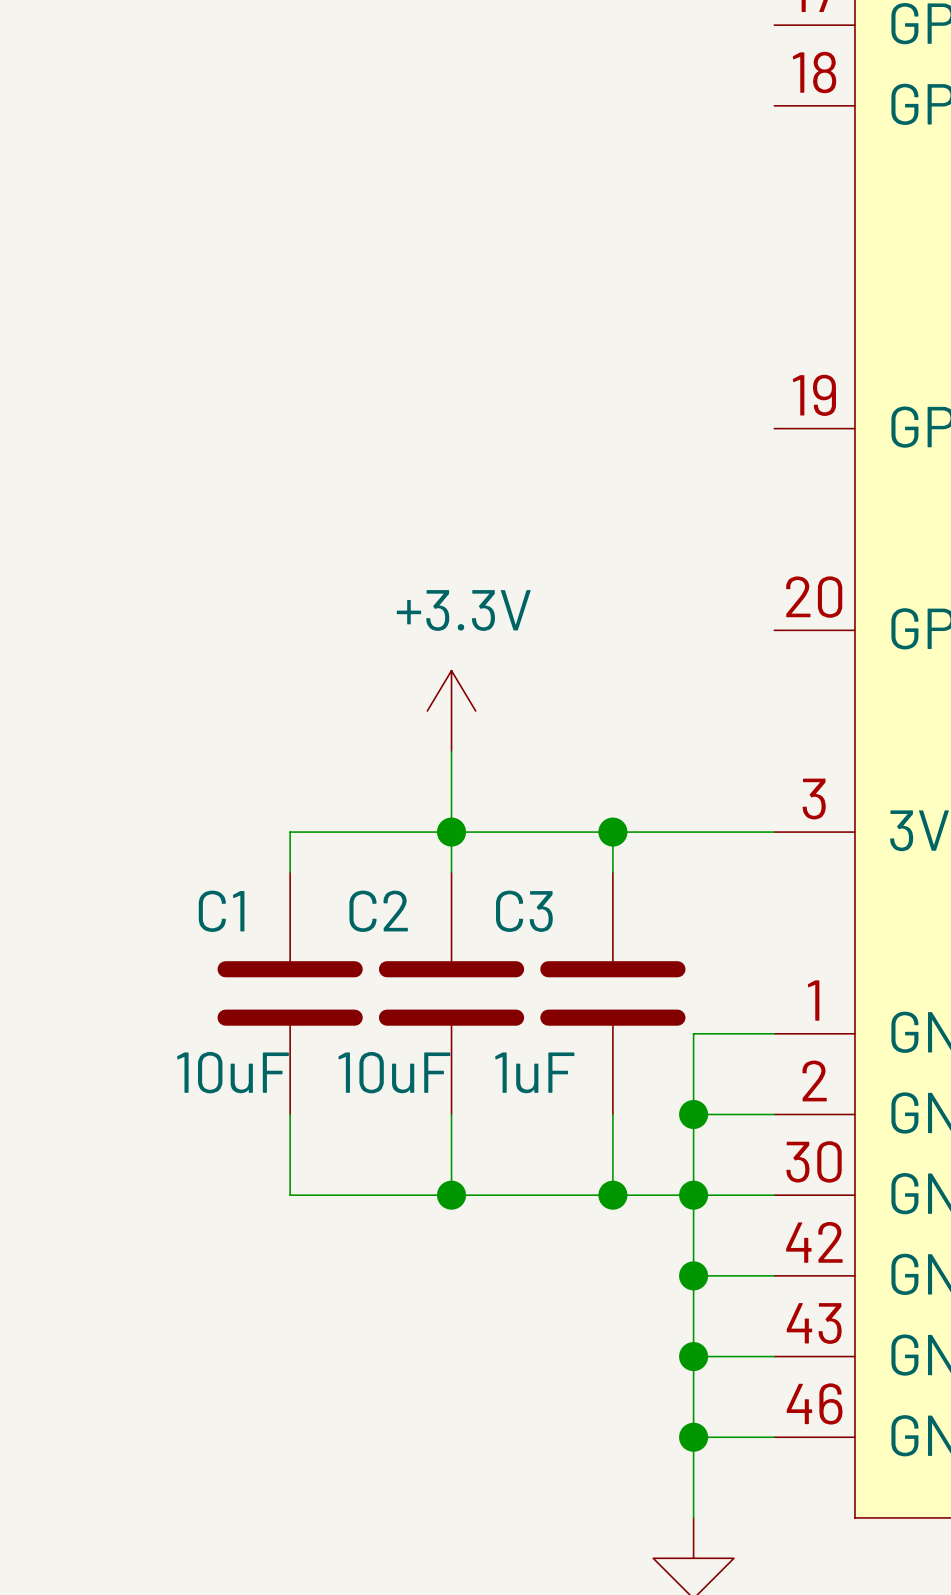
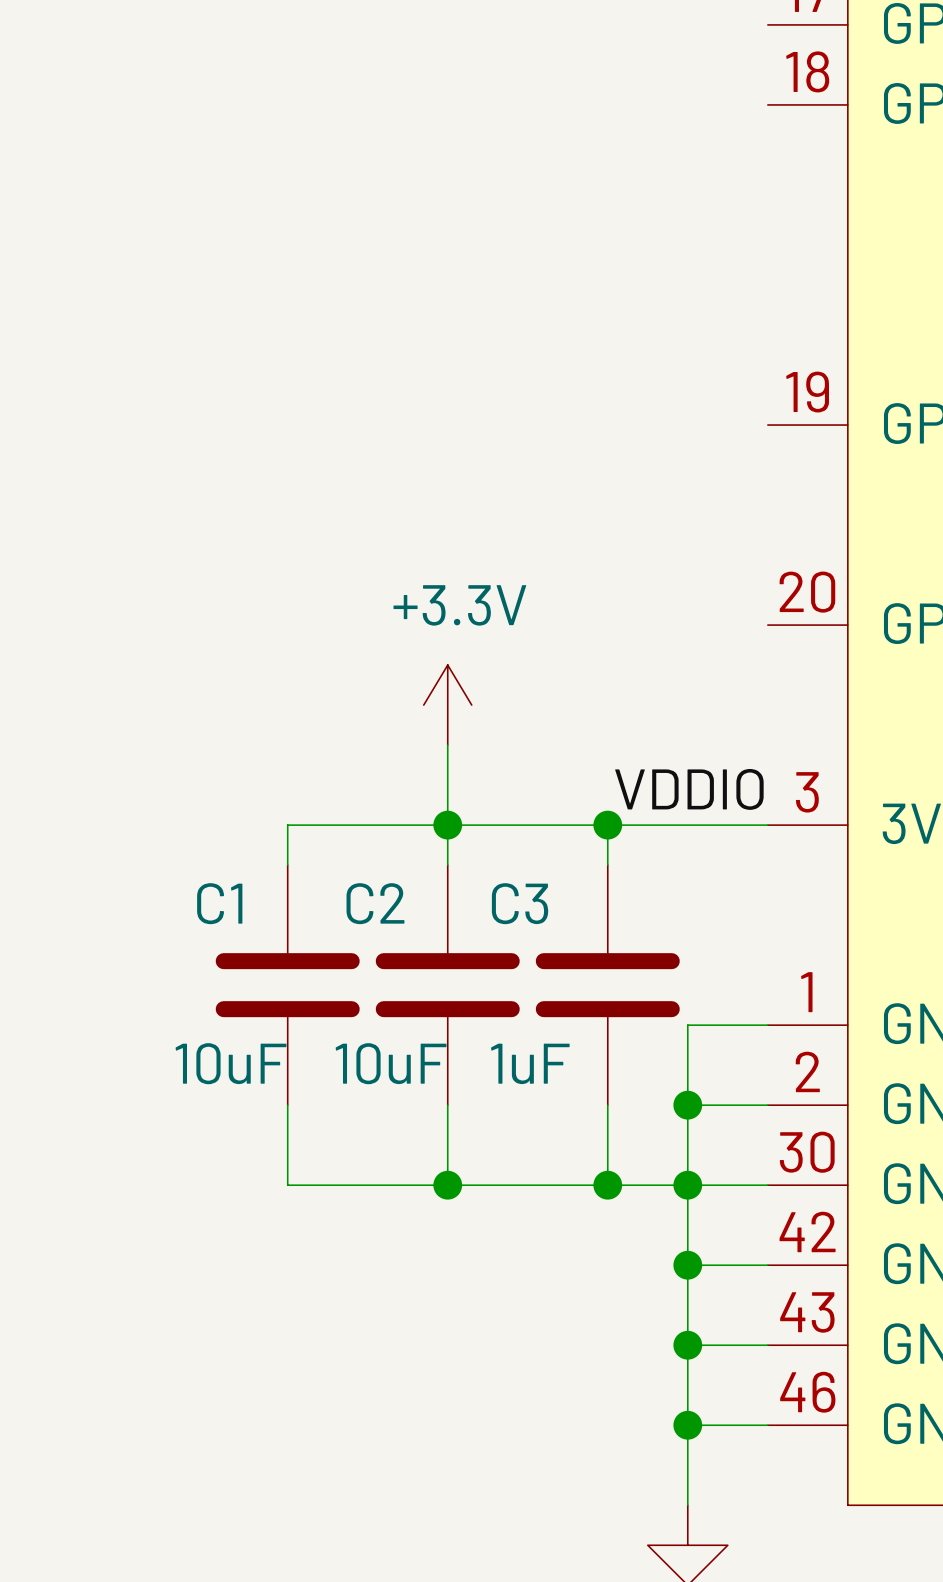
label: none -> VDDIO (689, 789)

